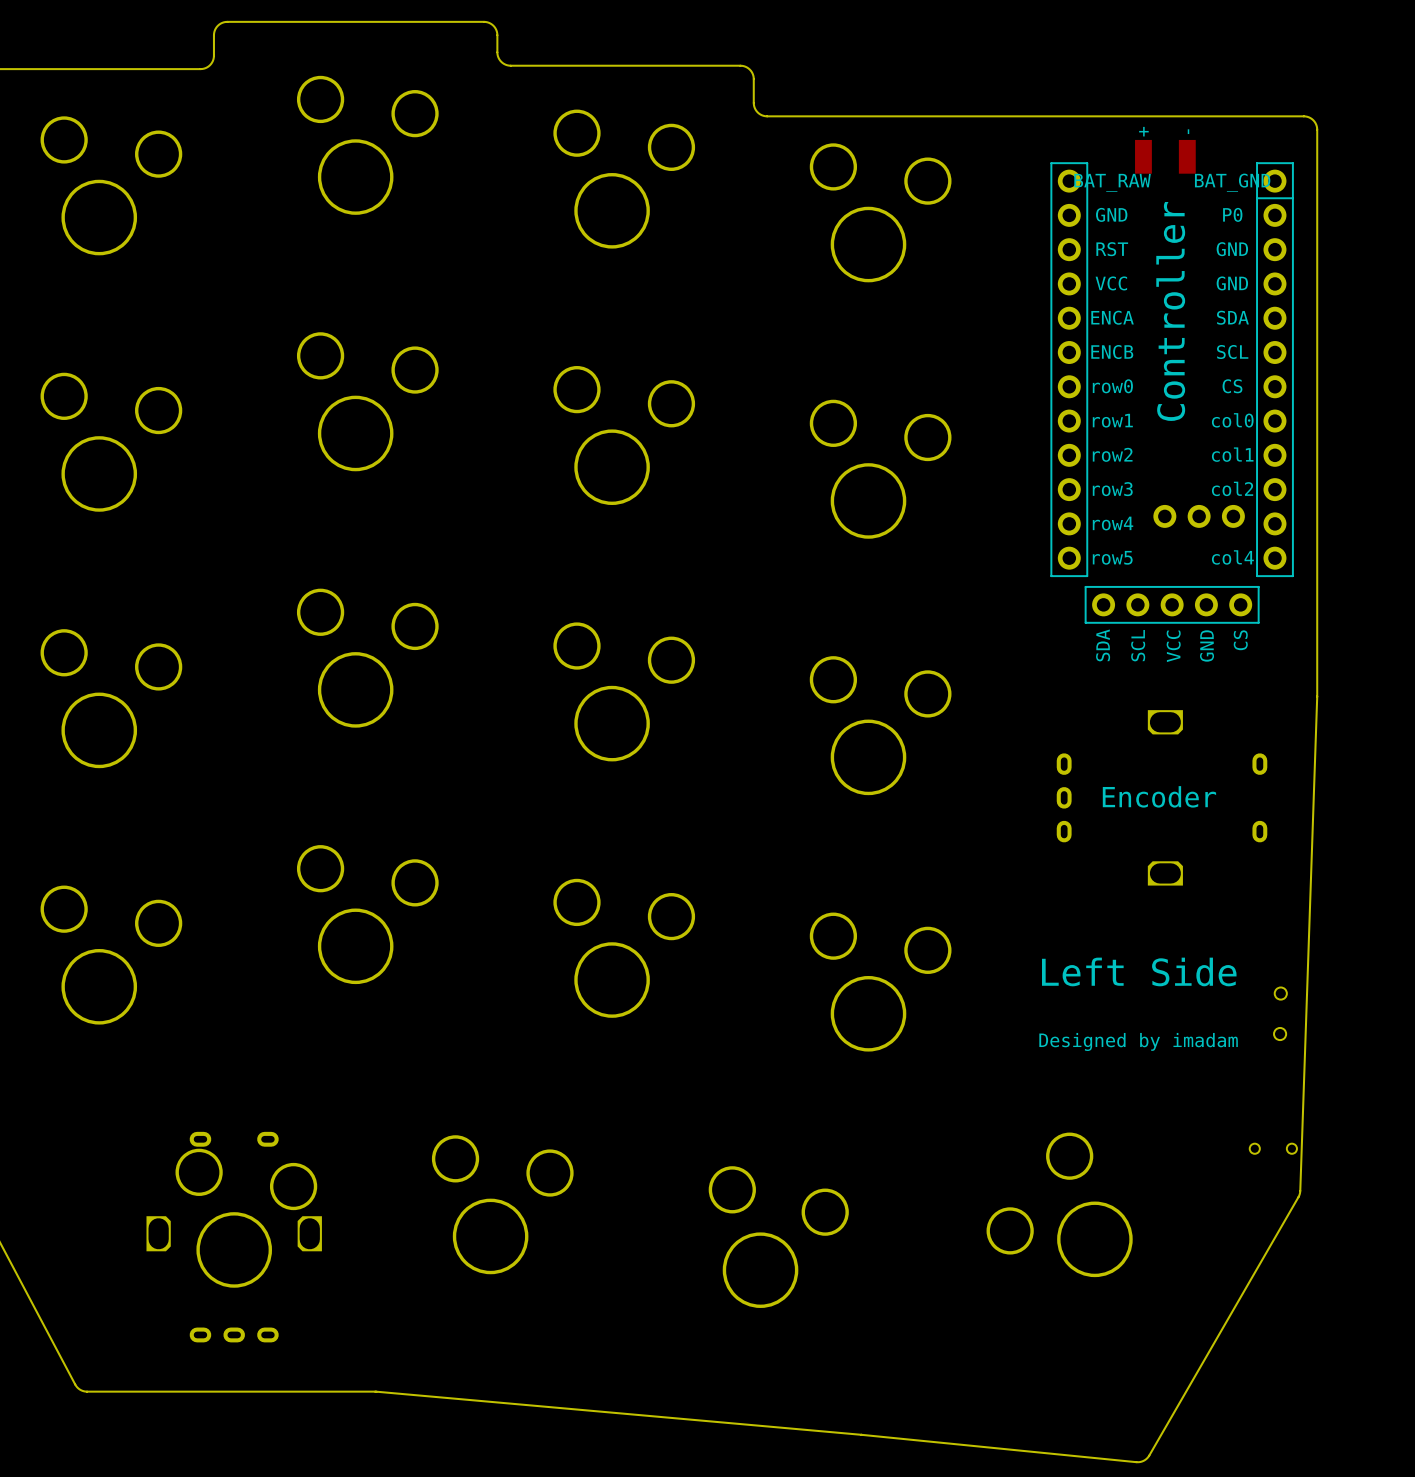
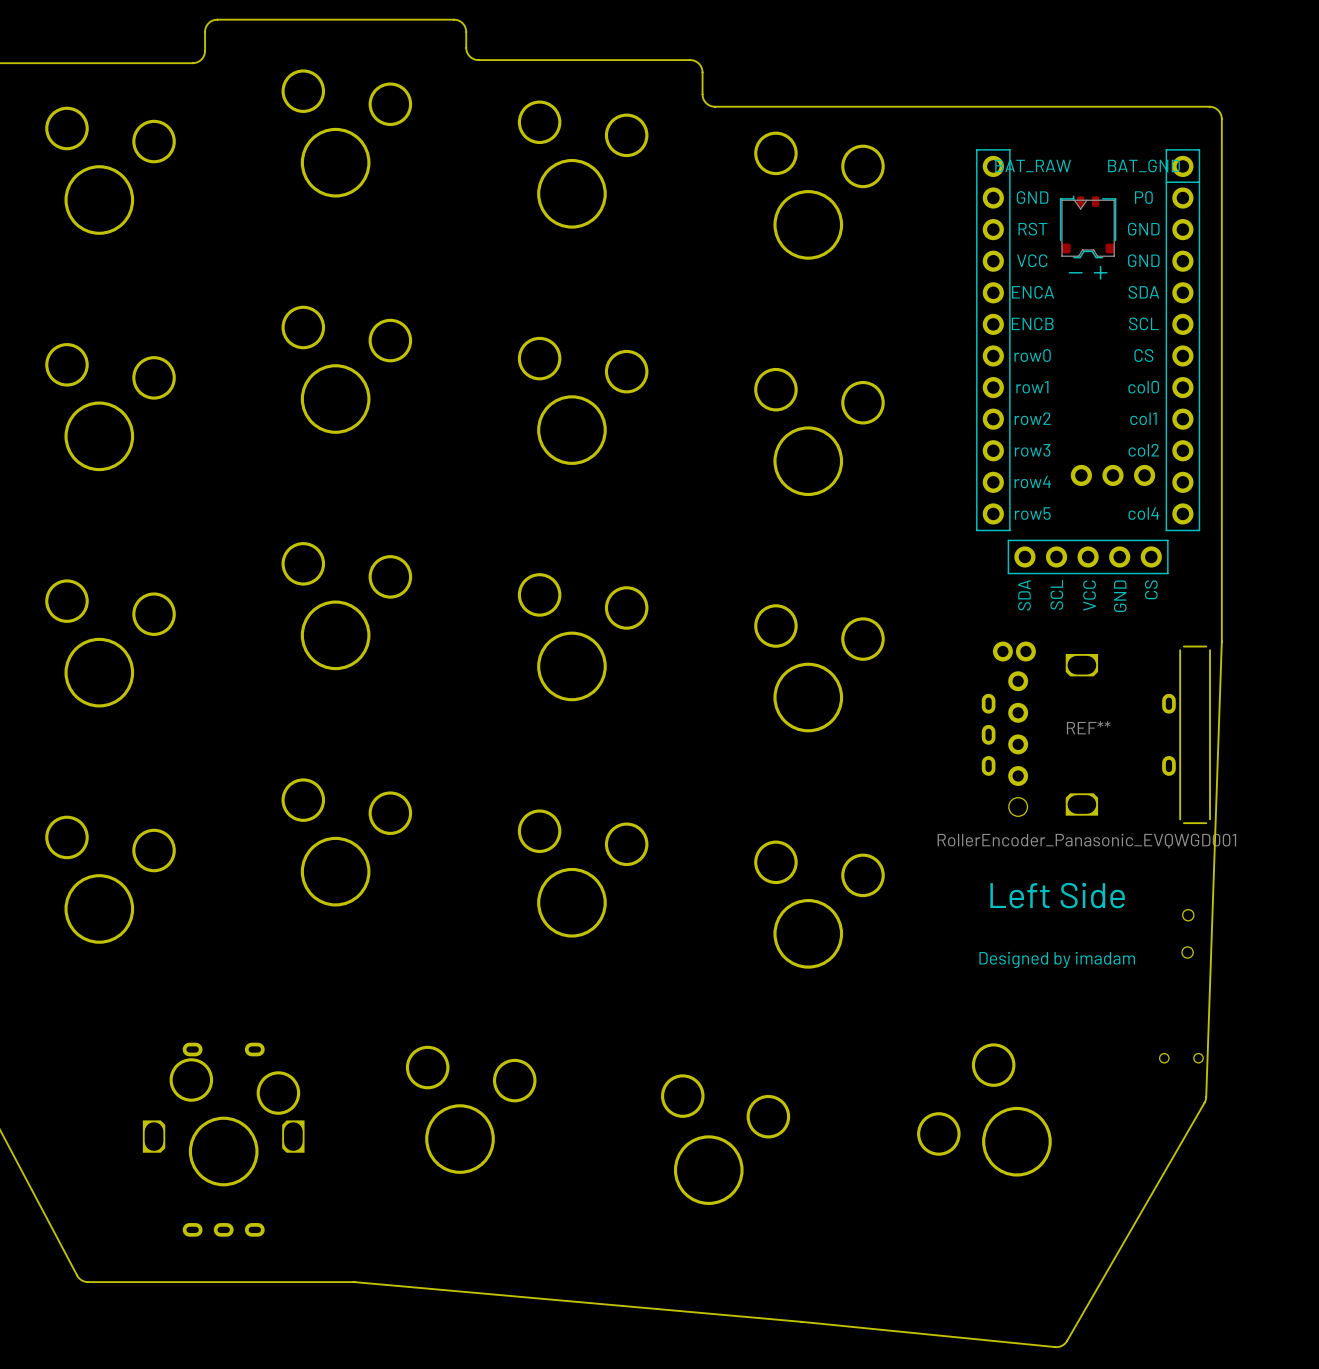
part: (1165, 156) -> none
part: none -> (1088, 237)
text: Controller (1170, 311) -> none
REF**: none -> RollerEncoder_Panasonic_EVQWGD001 (1101, 732)
text: Encoder (1159, 796) -> none

